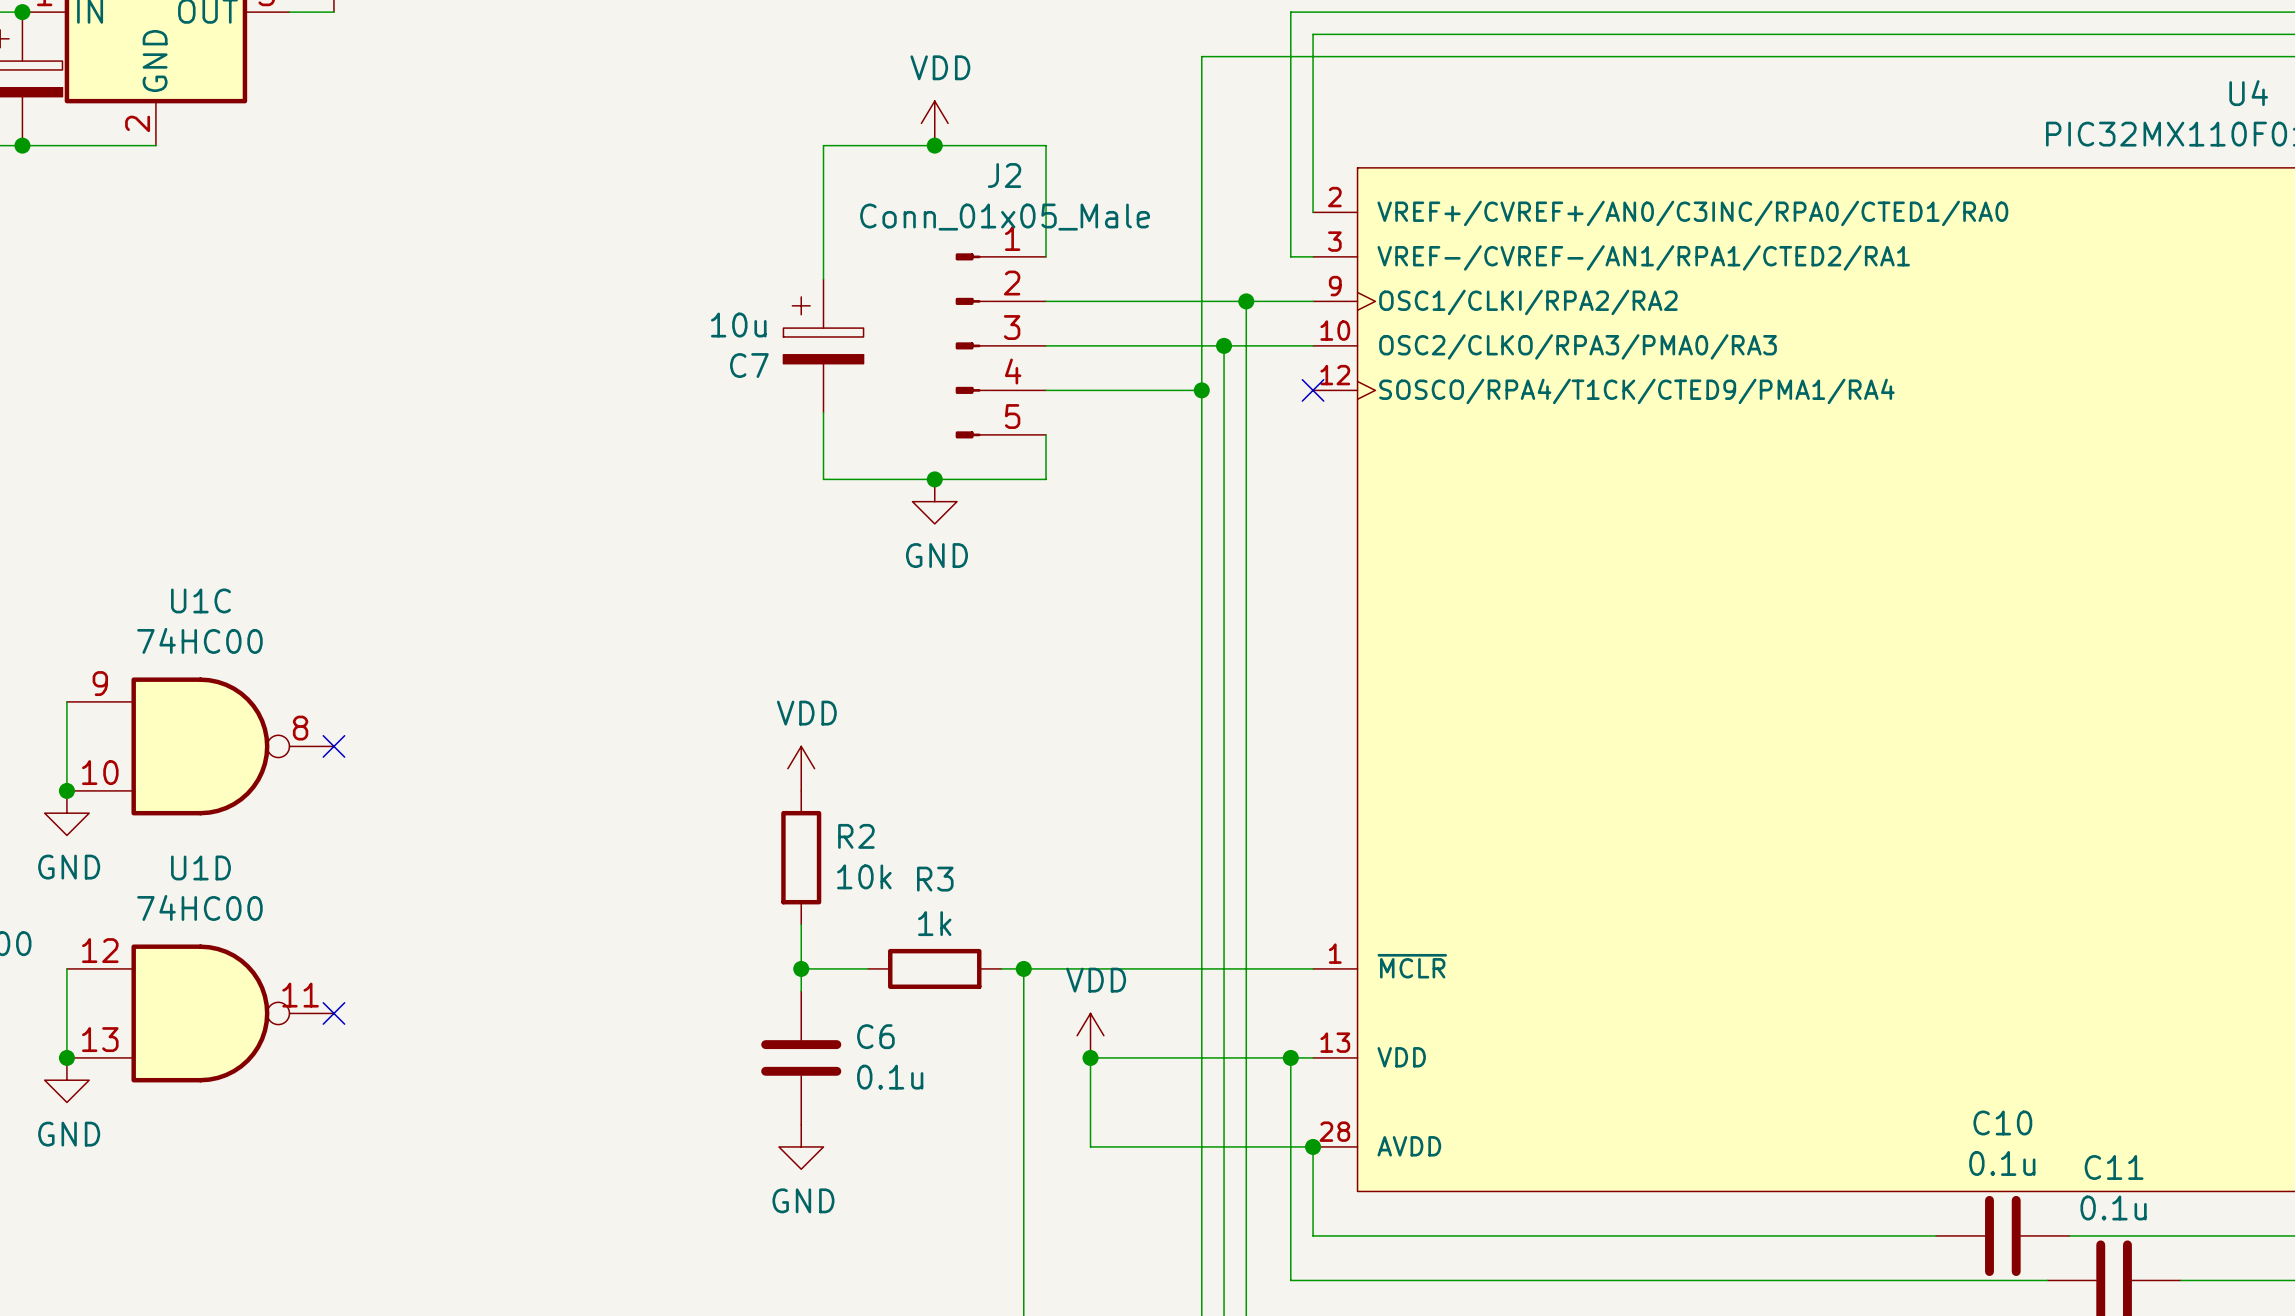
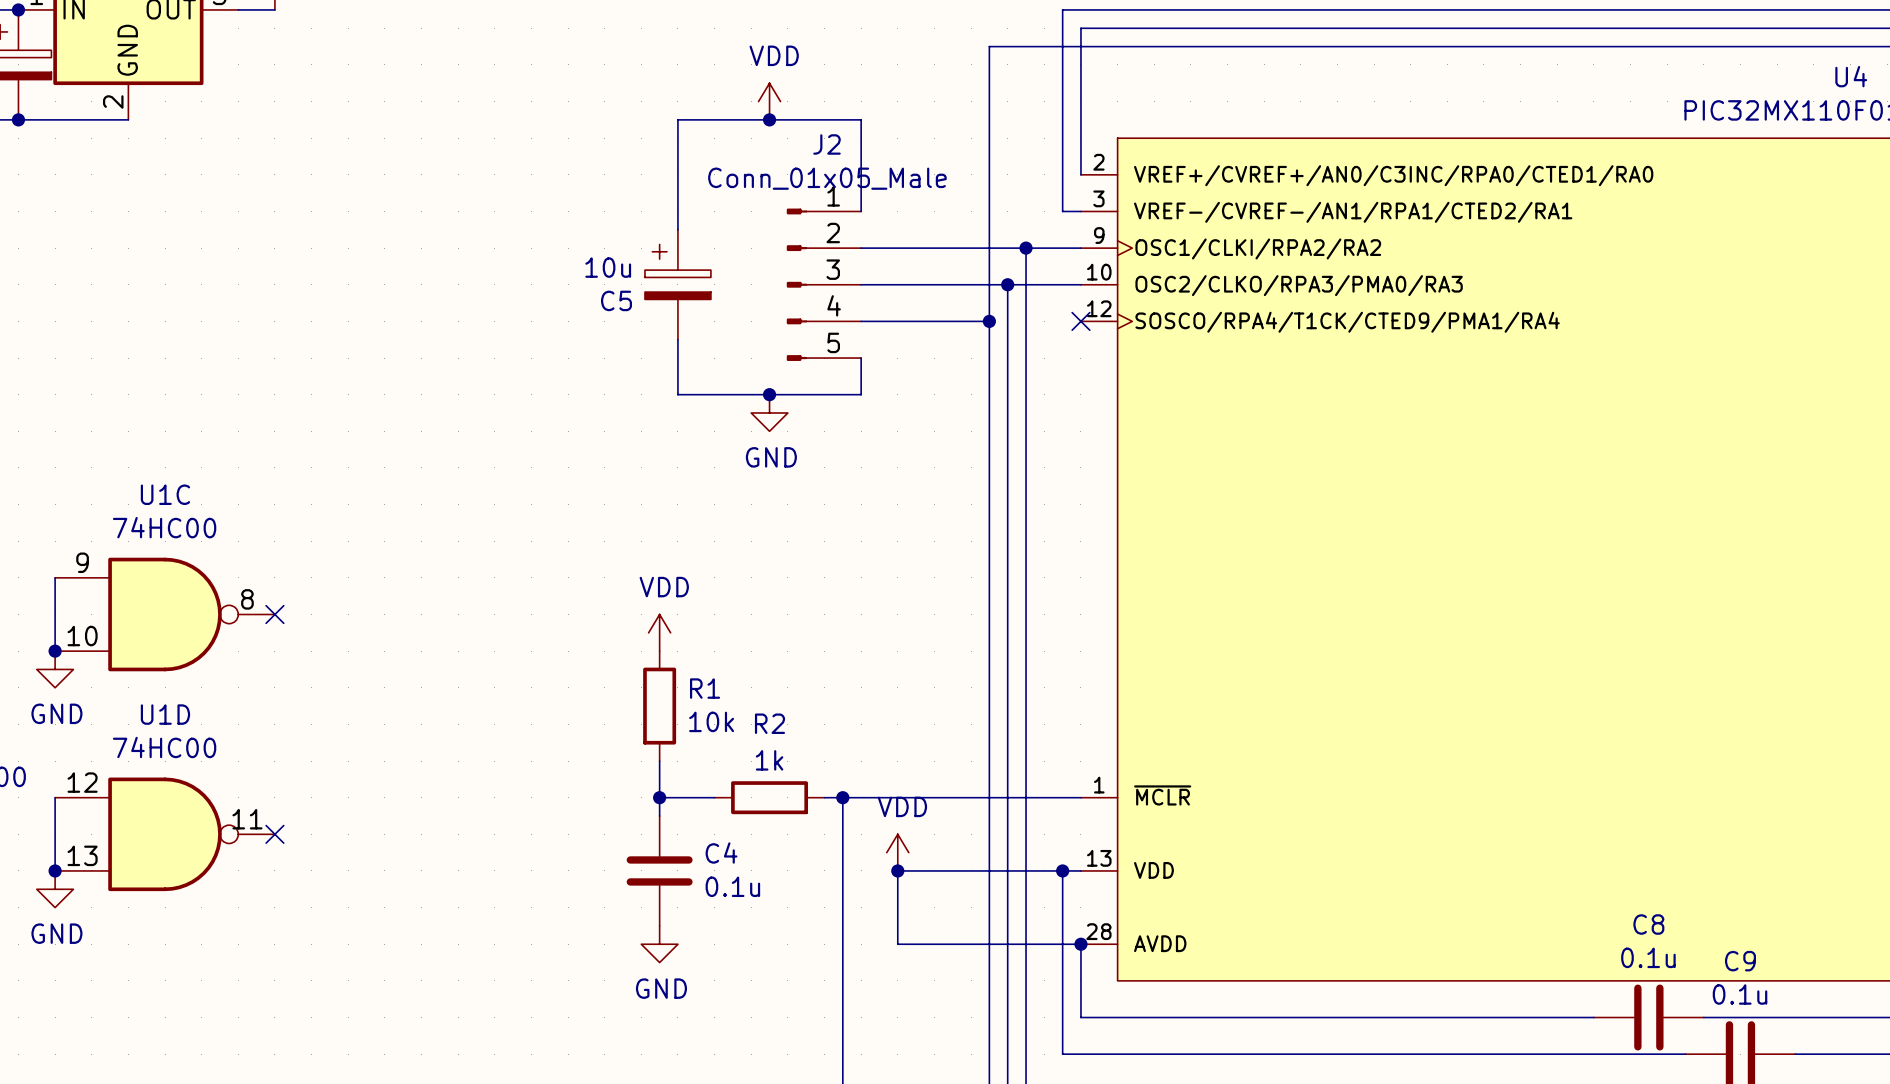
C7 name: C7 (749, 365) -> C5 (616, 300)
R2 name: R2 (856, 836) -> R1 (705, 688)
R3 name: R3 (935, 879) -> R2 (769, 723)
C6 name: C6 (875, 1036) -> C4 (721, 852)
C10 name: C10 (2002, 1122) -> C8 (1648, 924)
C11 name: C11 (2114, 1167) -> C9 (1740, 961)

